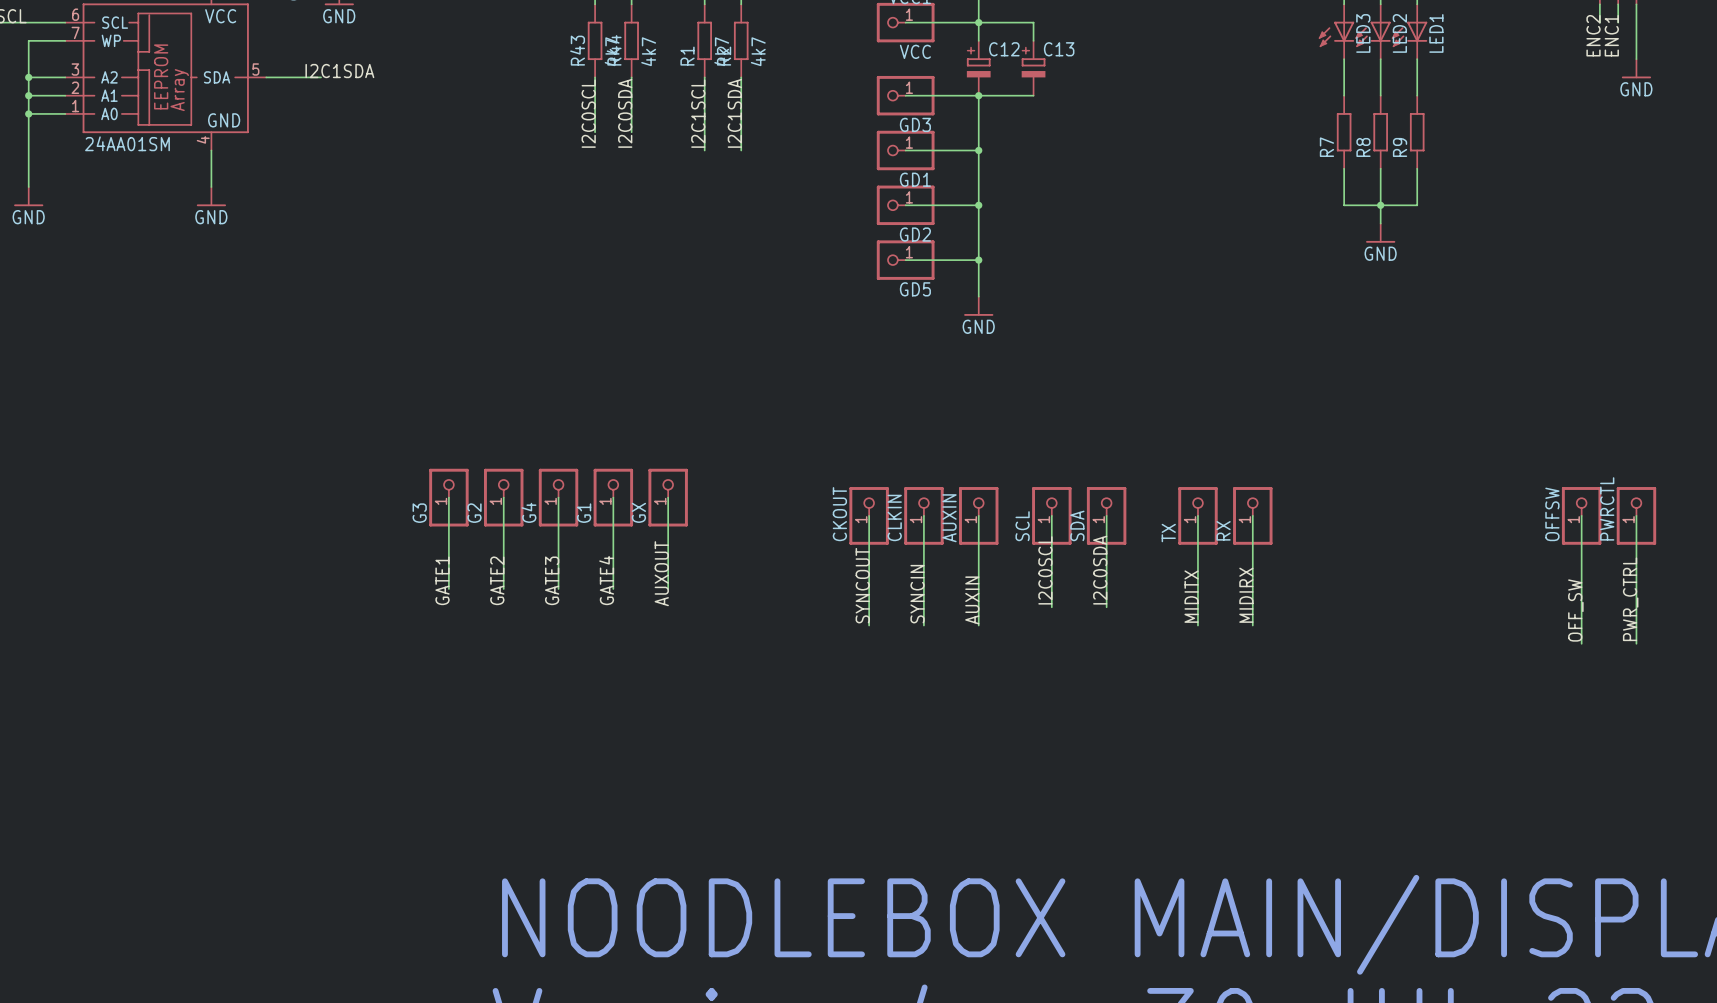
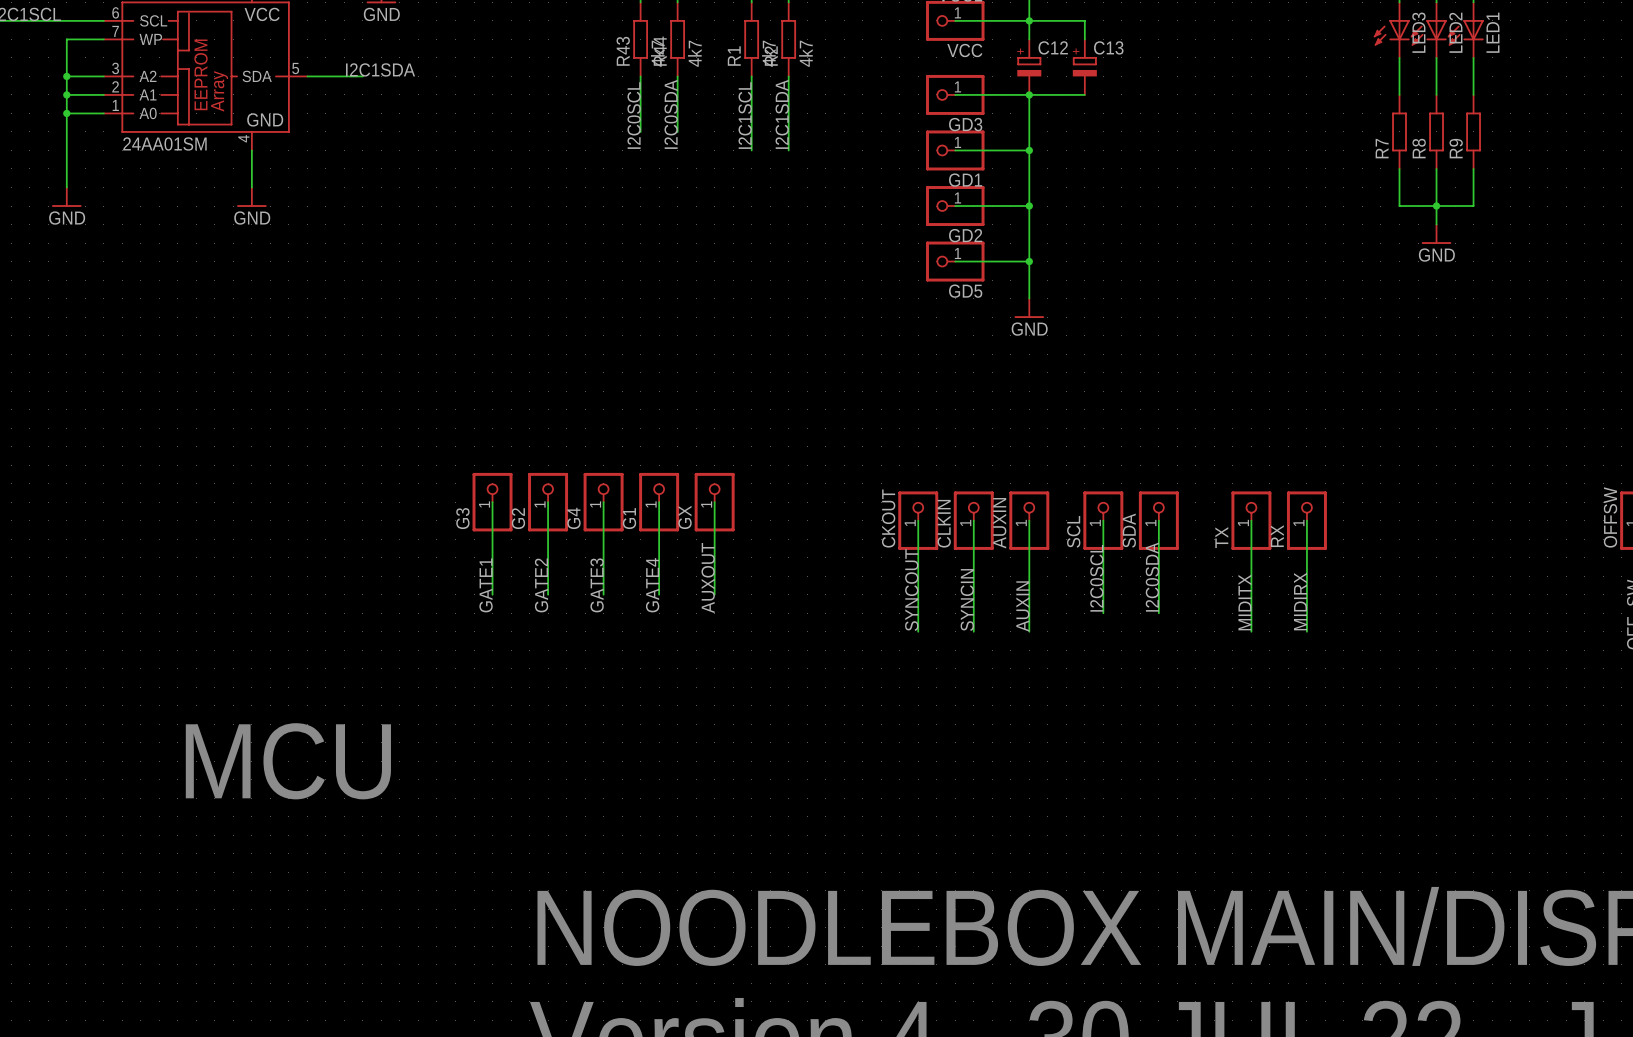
text: none -> MCU (288, 761)

